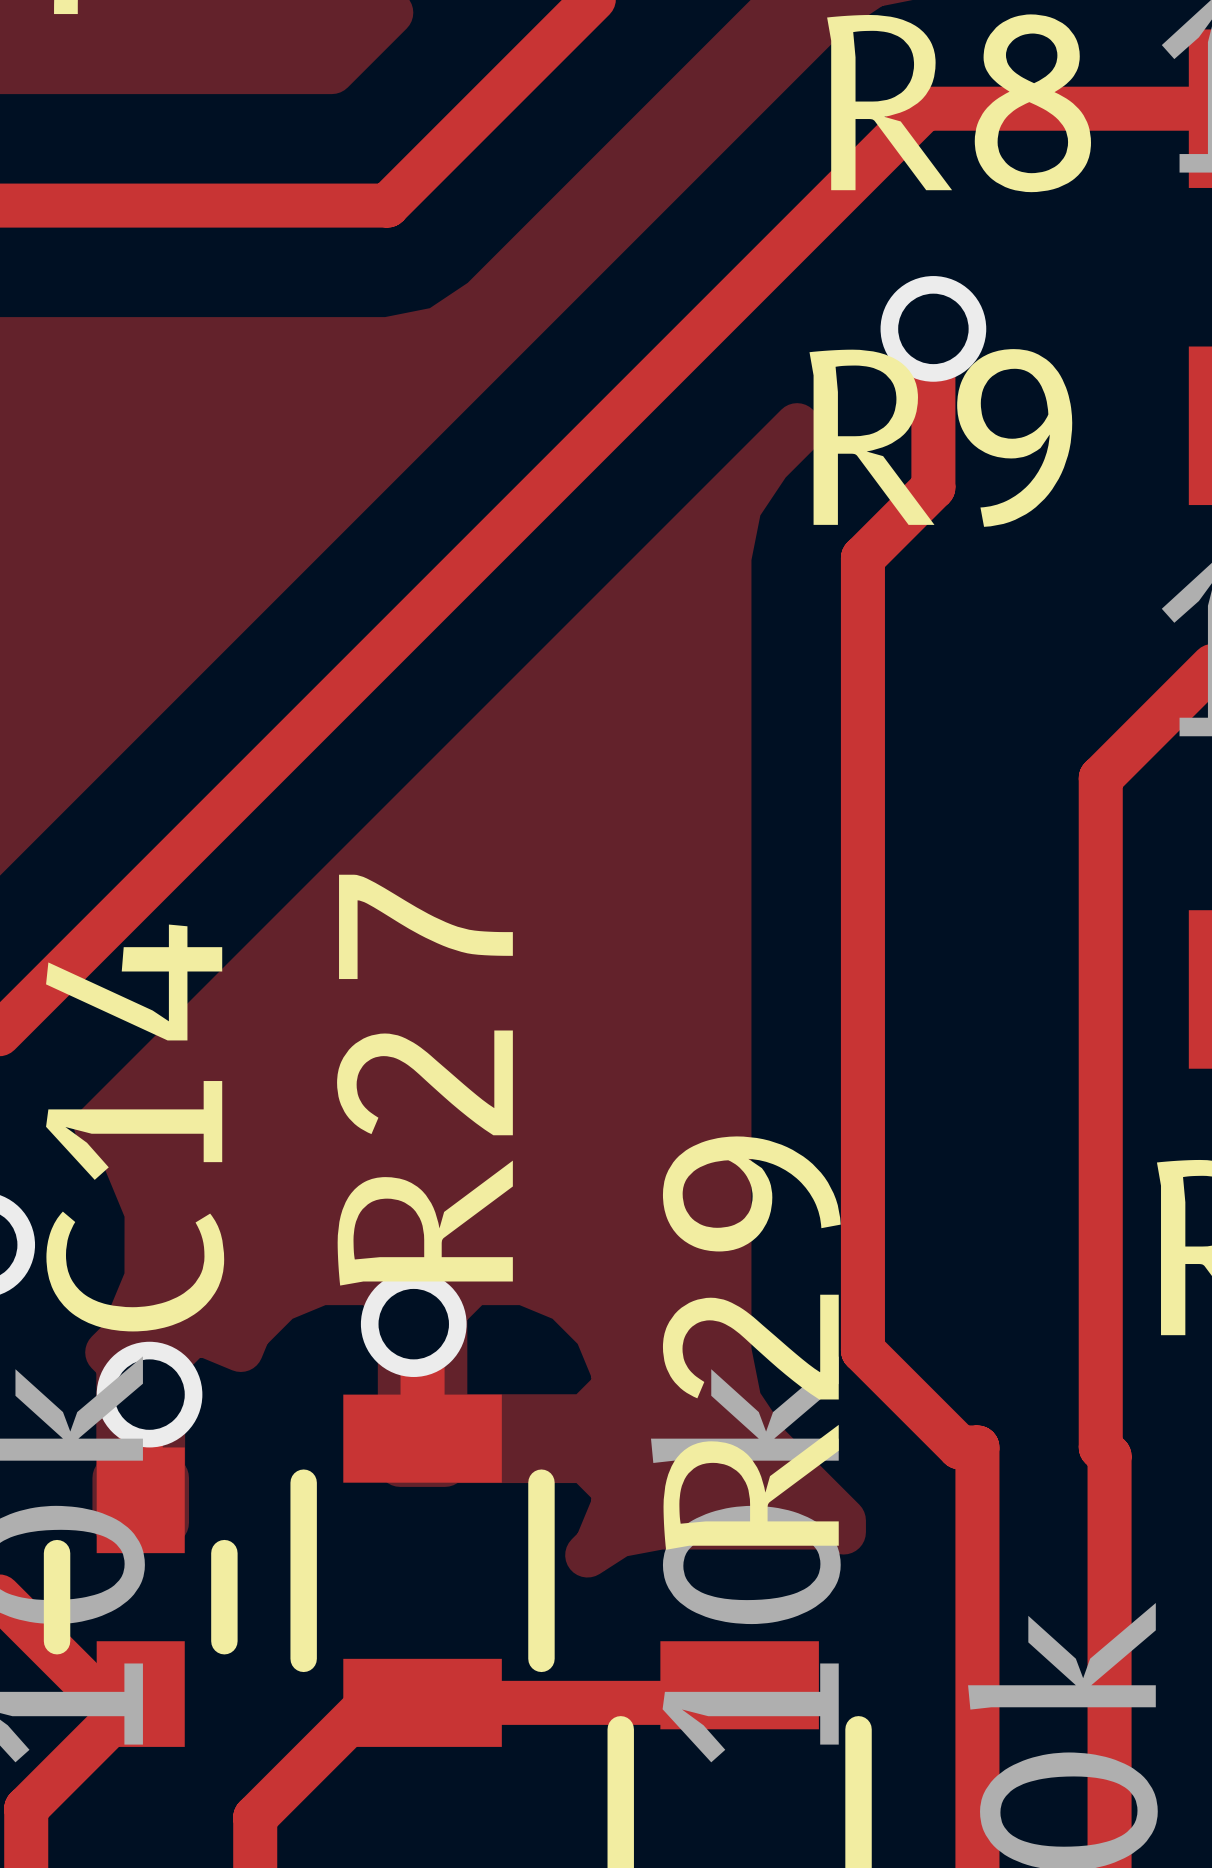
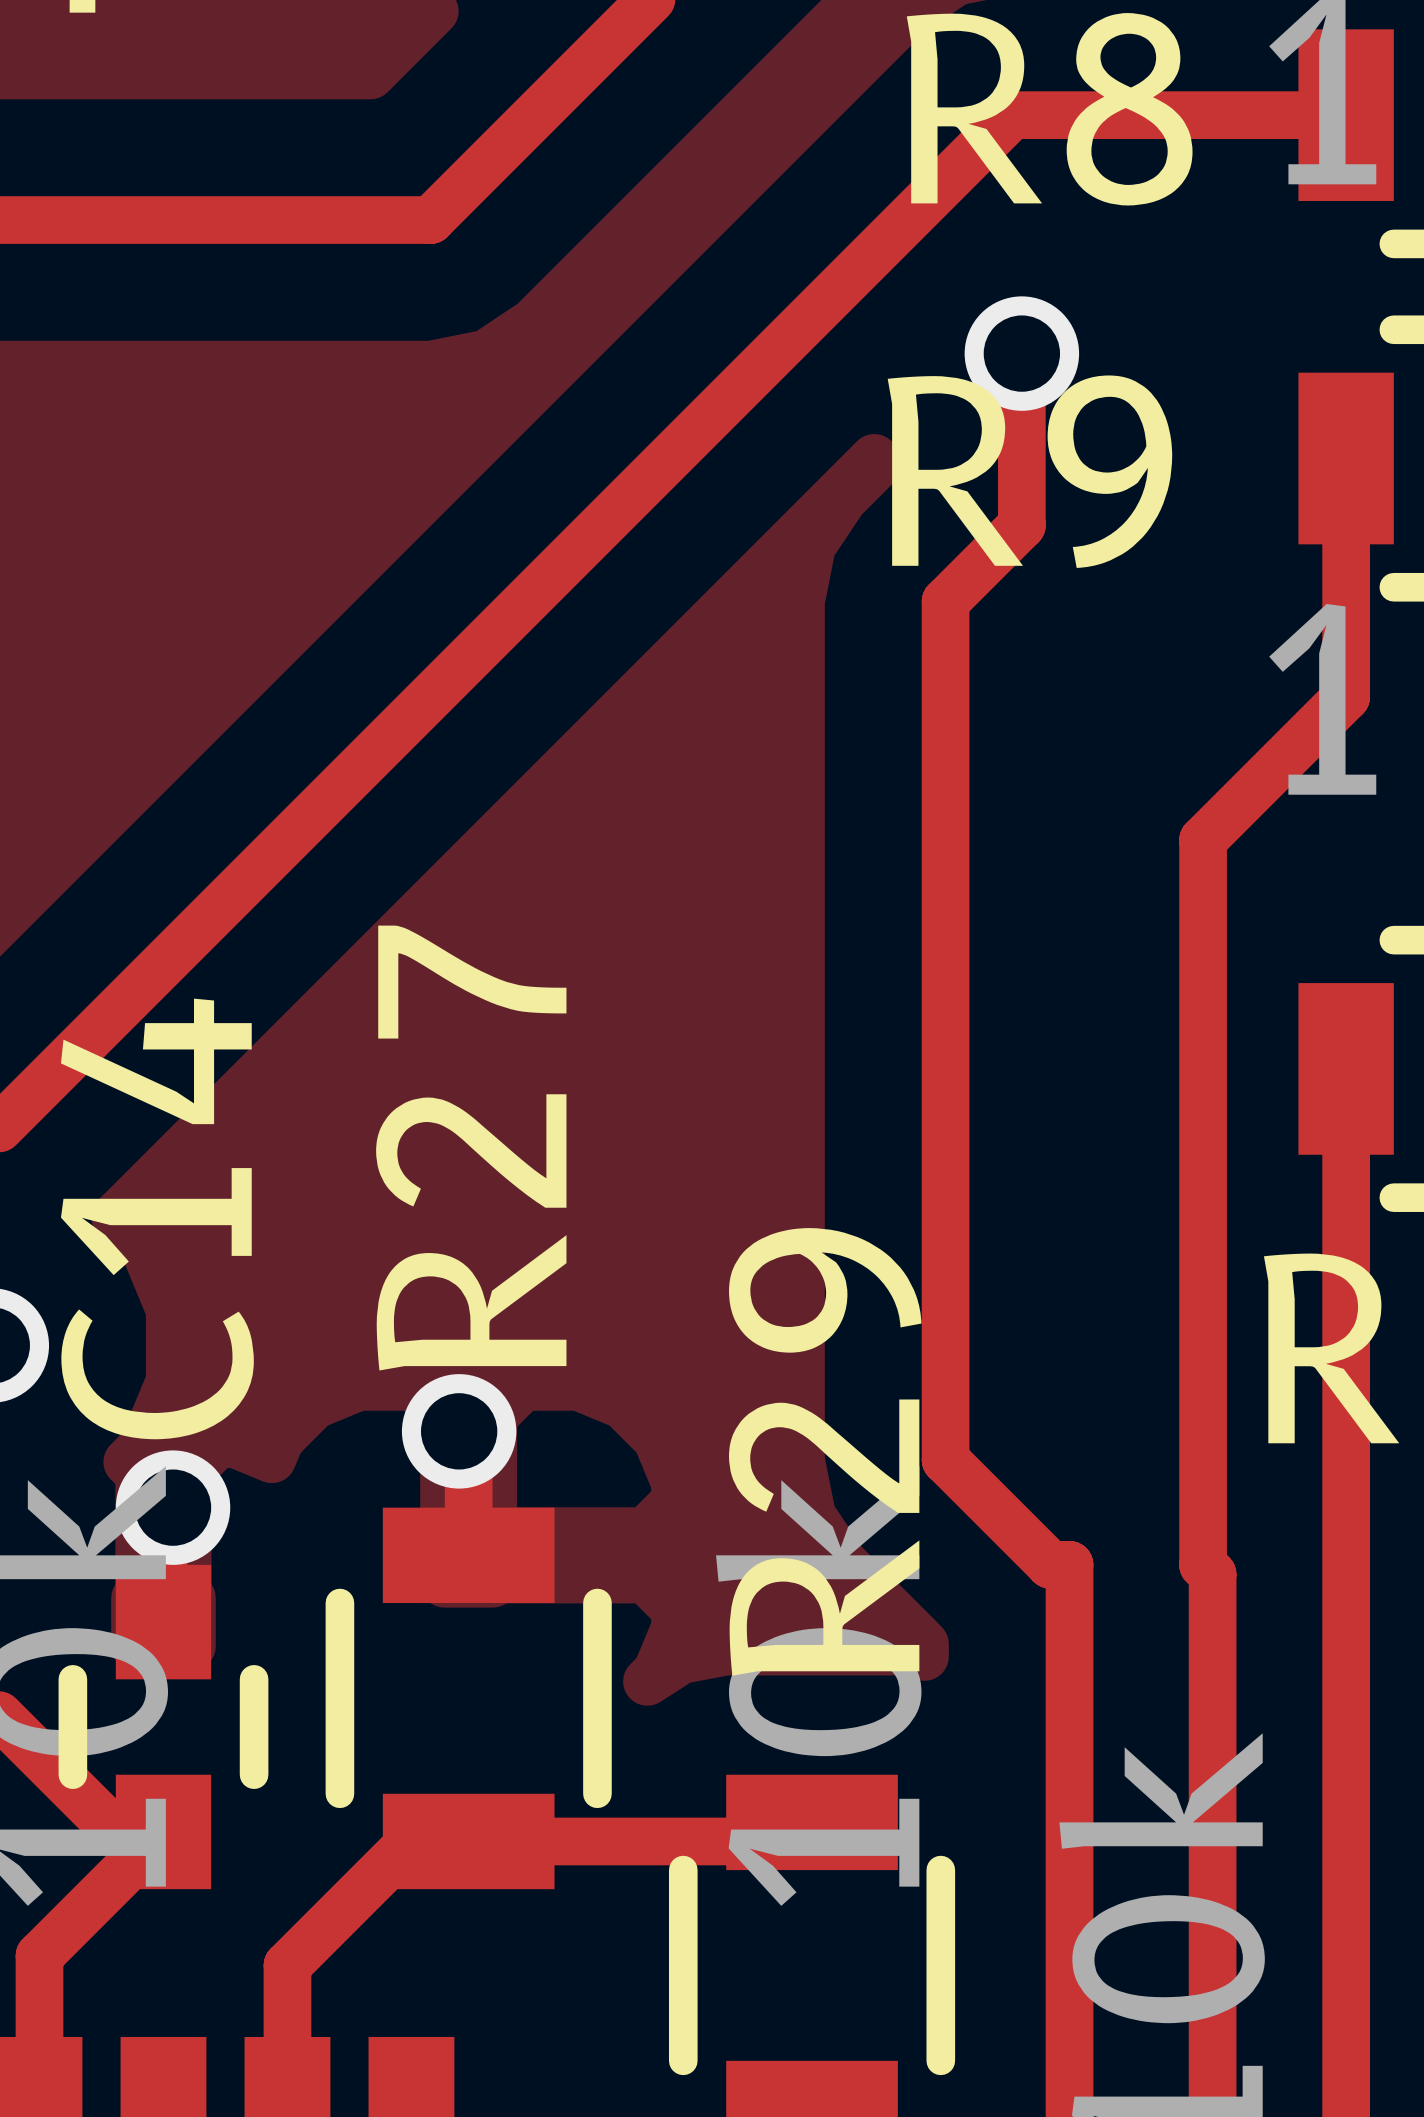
R27 name position: R27 (424, 1080) -> R27 (471, 1148)

